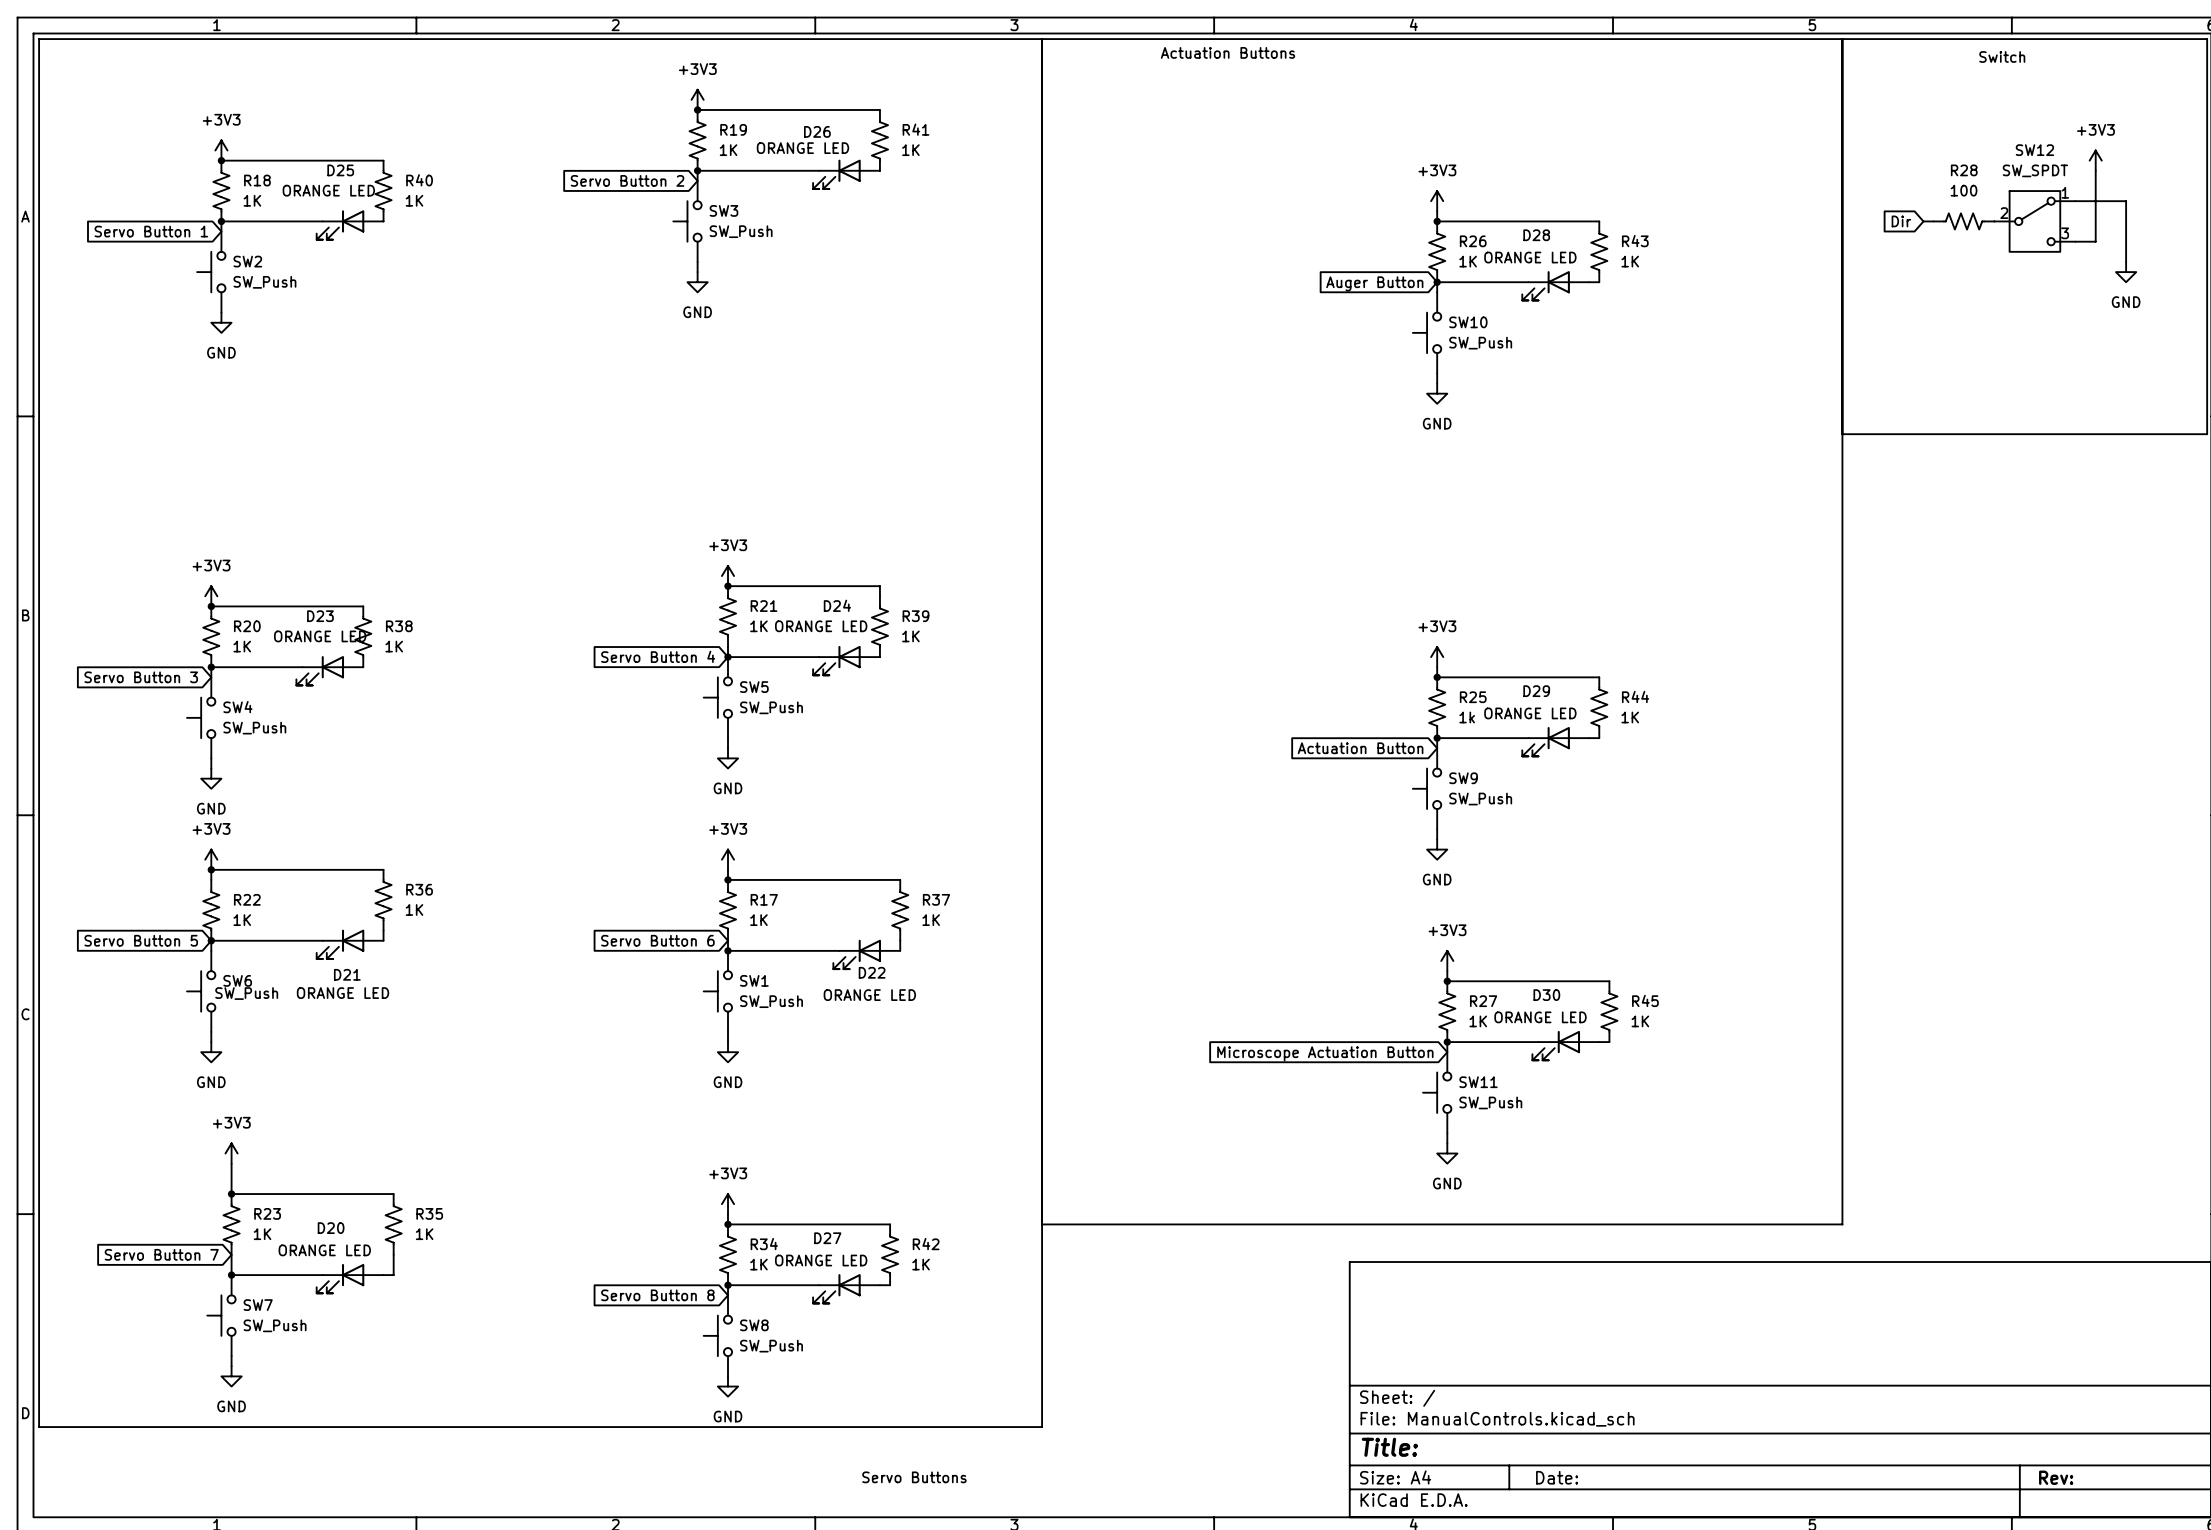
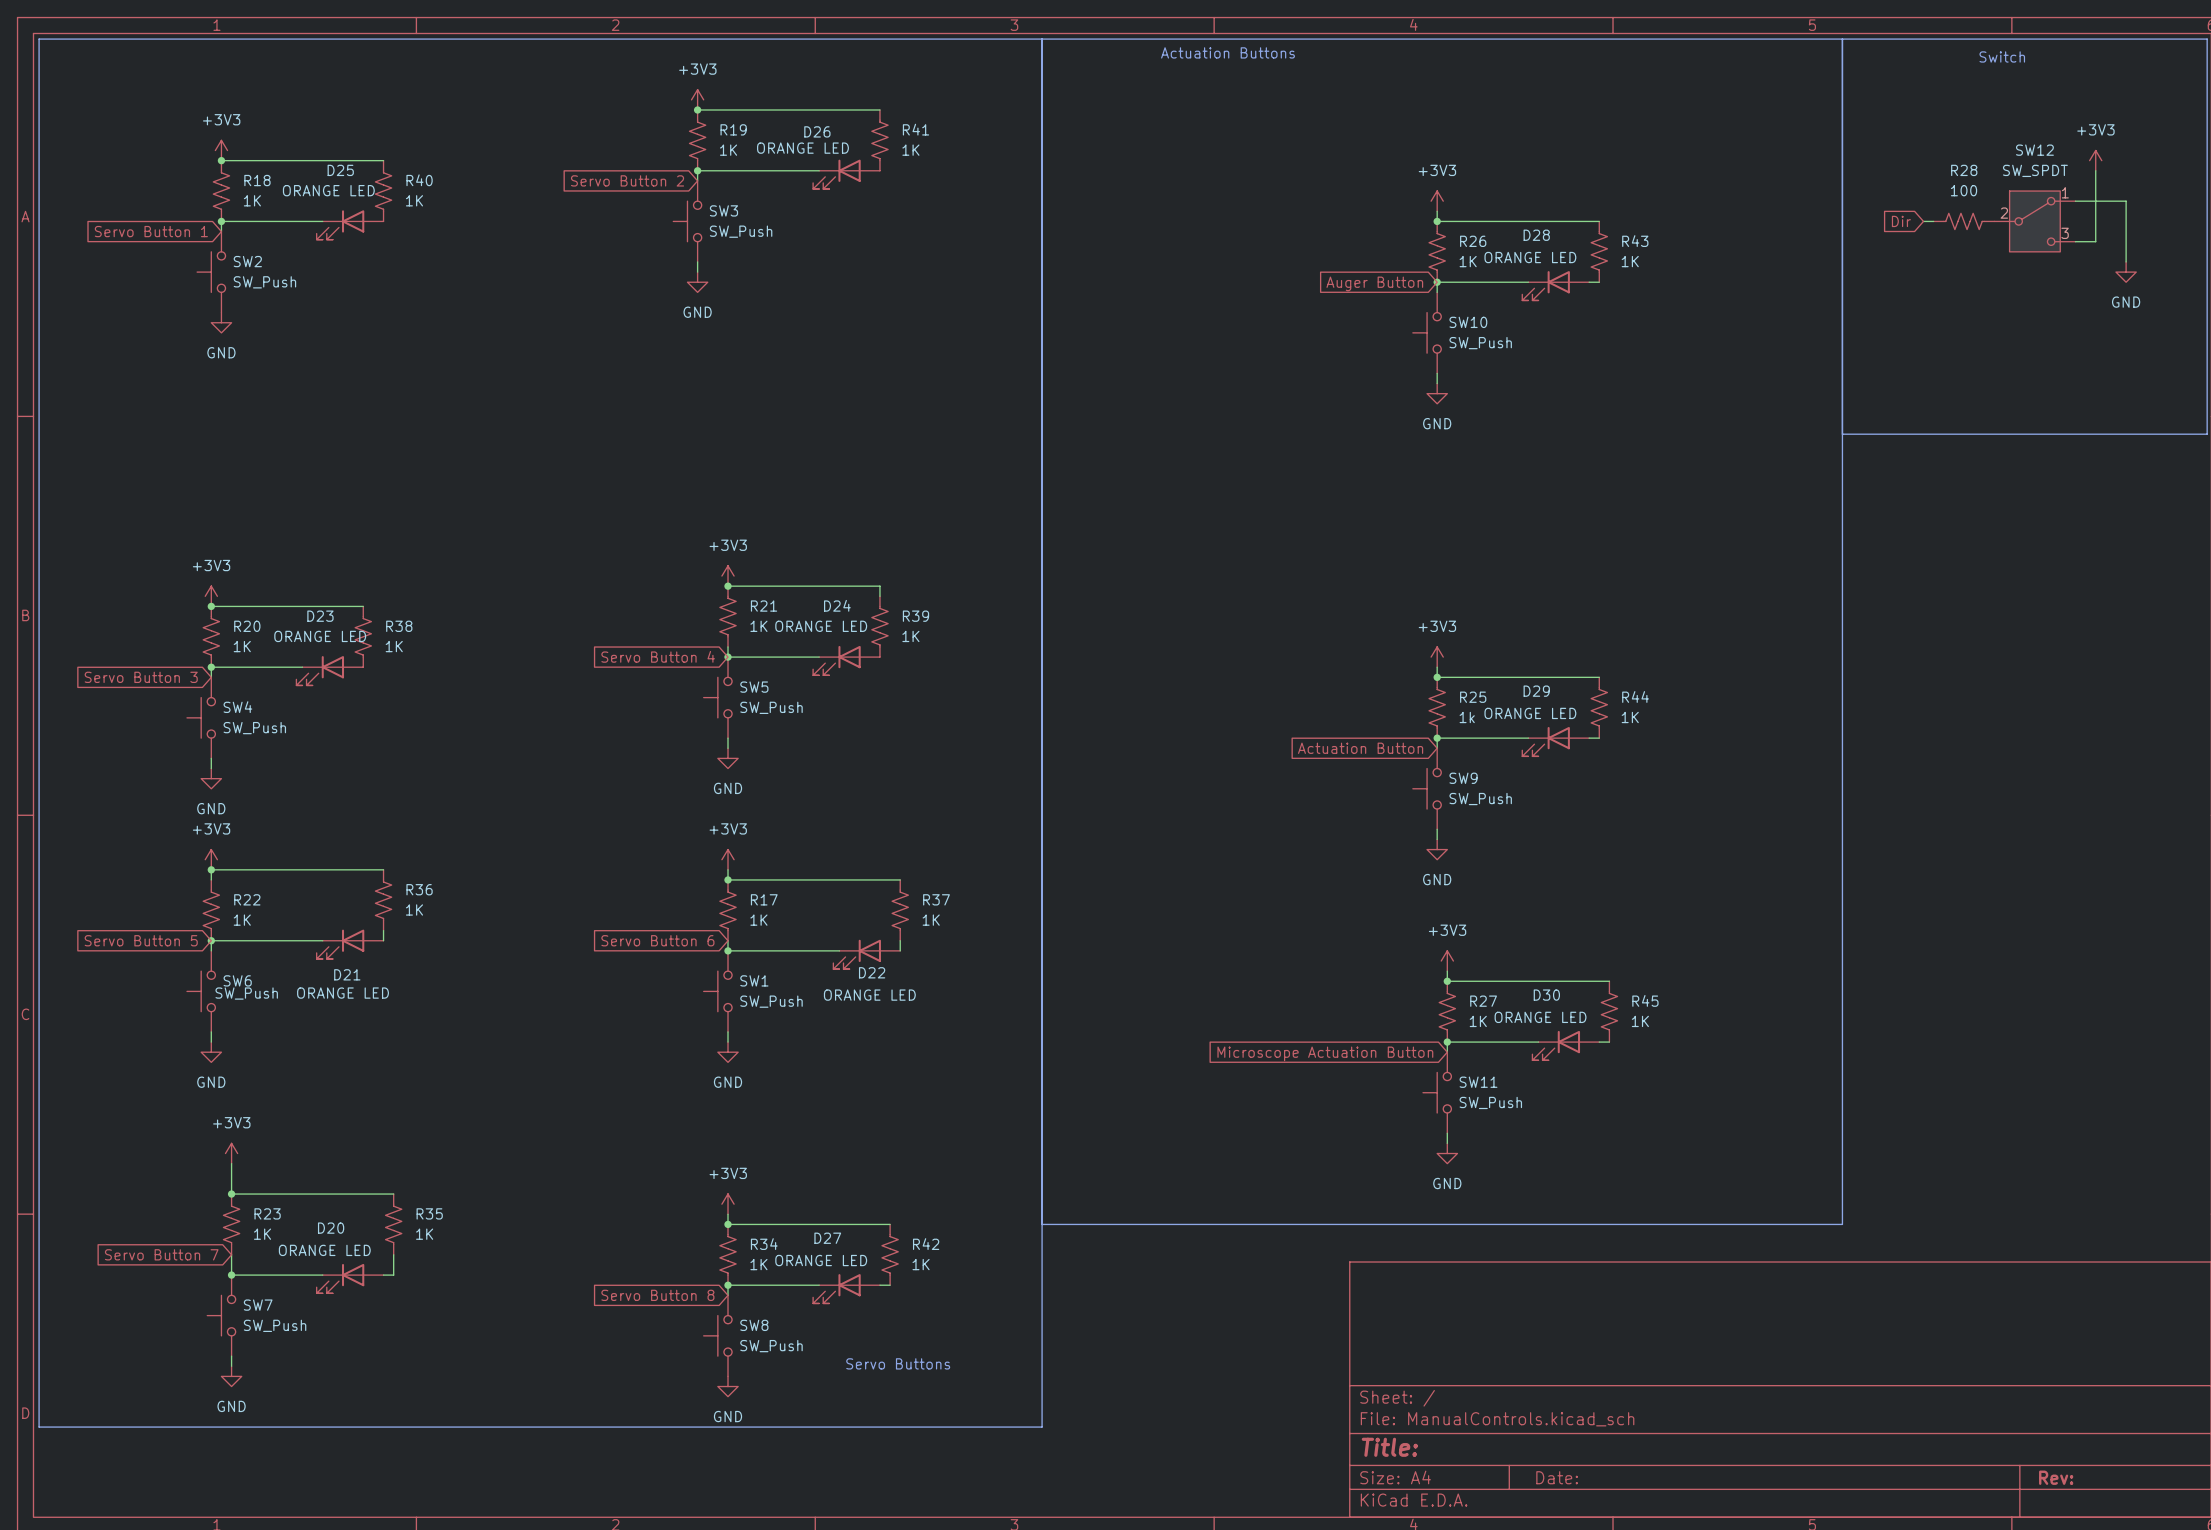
text position: Servo Buttons (914, 1477) -> Servo Buttons (898, 1363)

